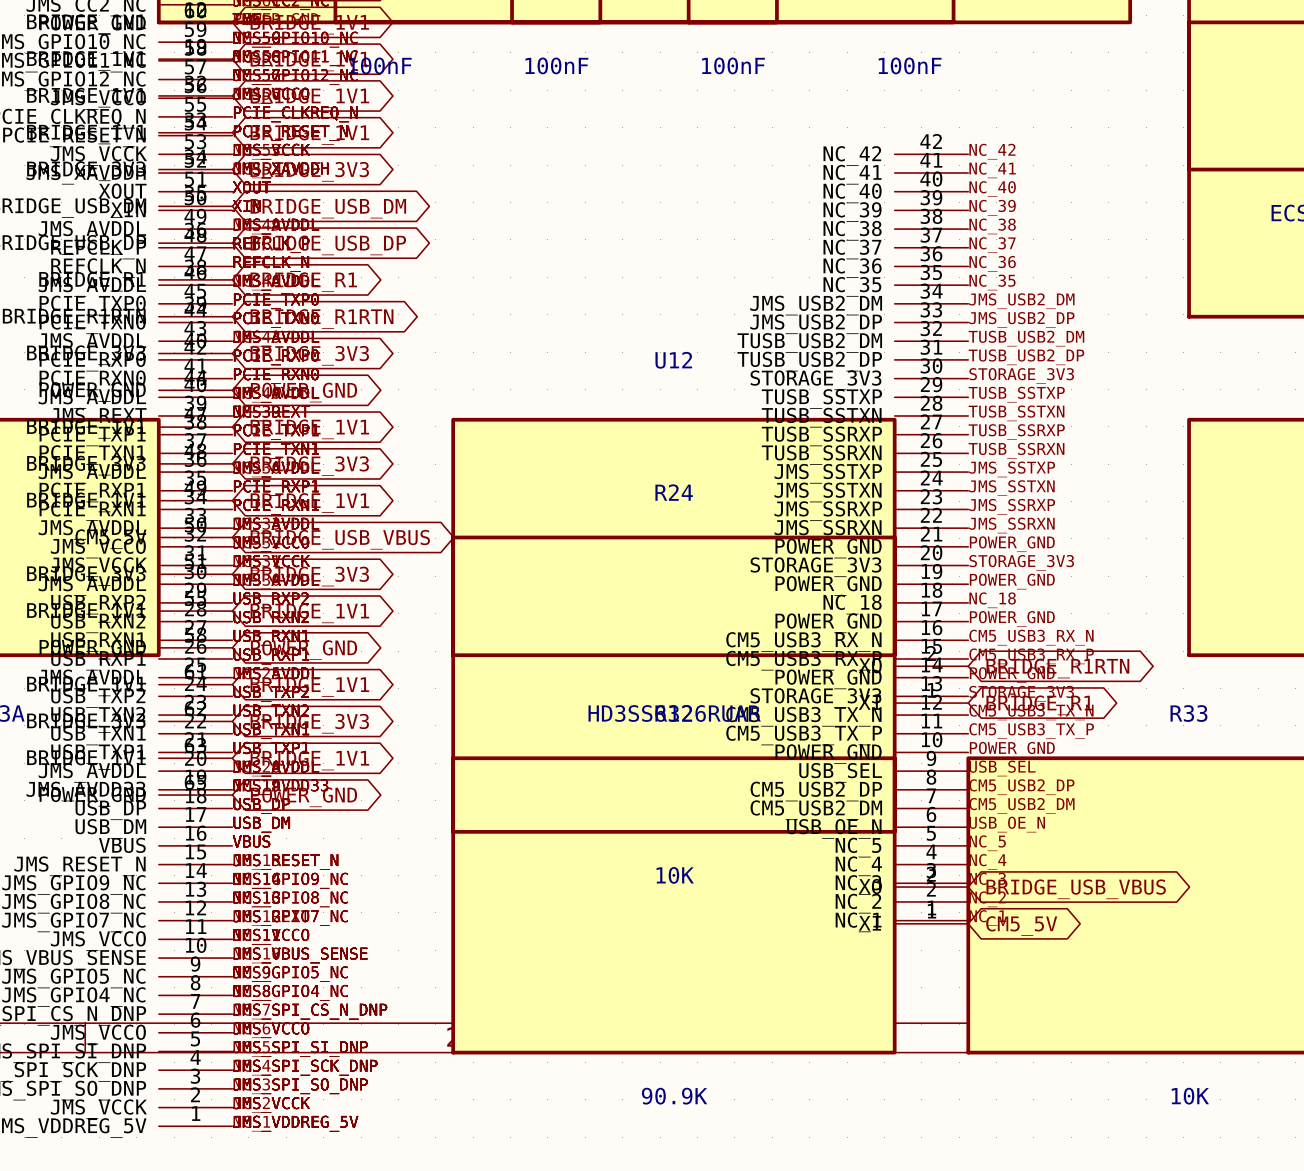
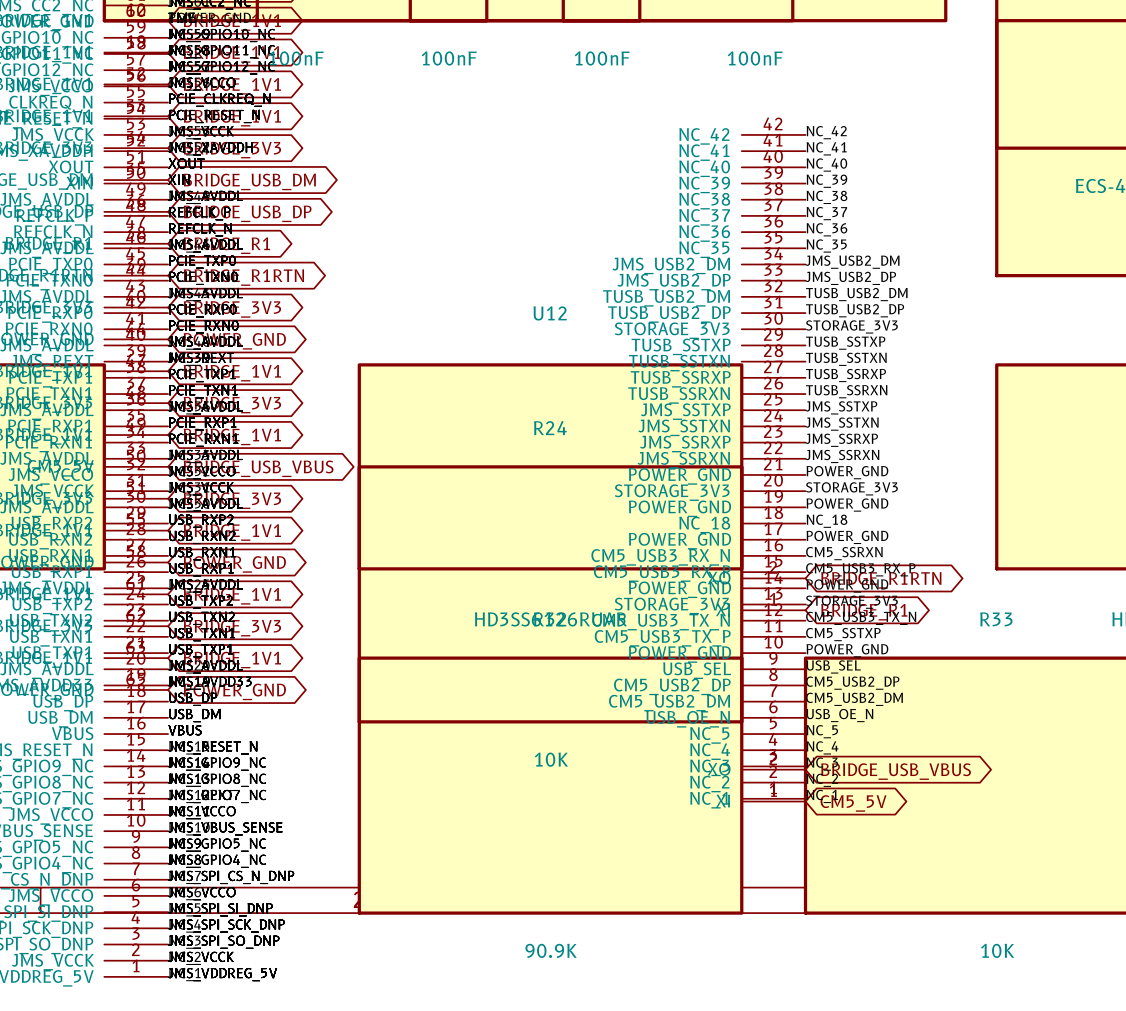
label: CM5_USB3_RX_N (1031, 637) -> CM5_SSRXN (844, 553)
label: CM5_USB3_TX_P (1031, 731) -> CM5_SSTXP (843, 634)

